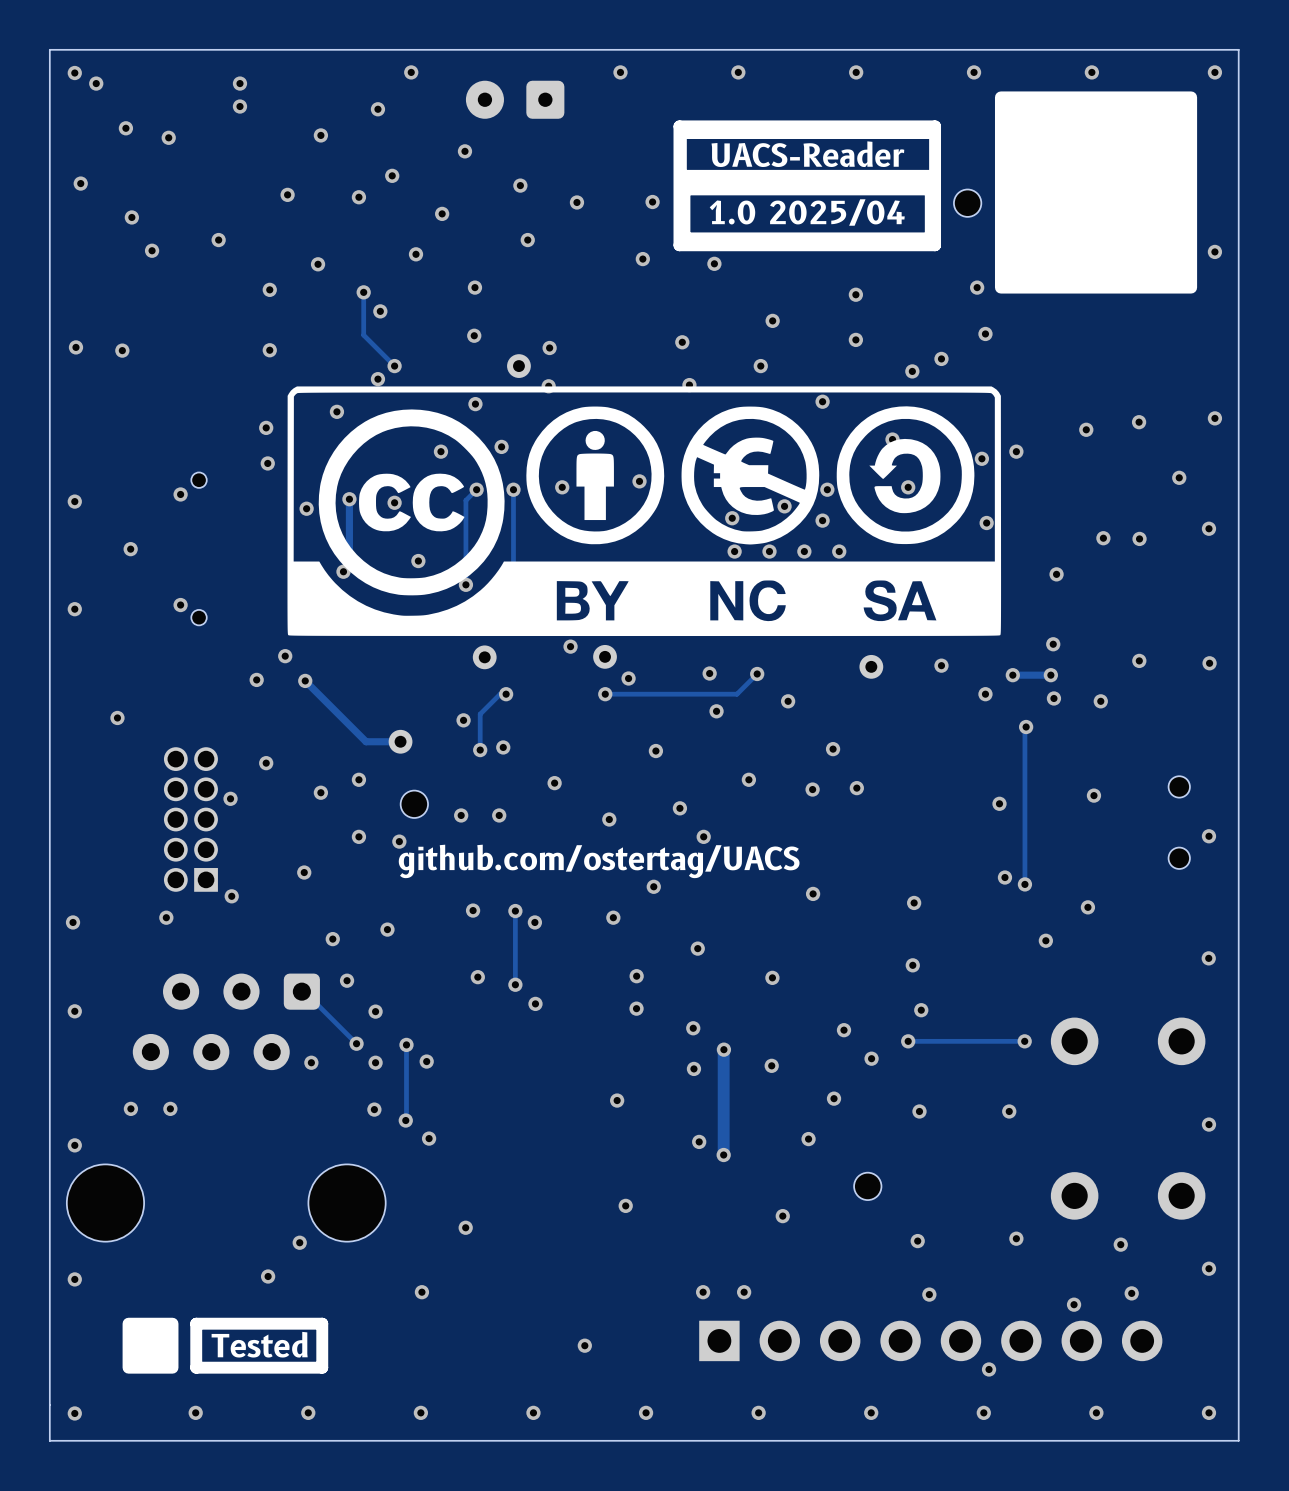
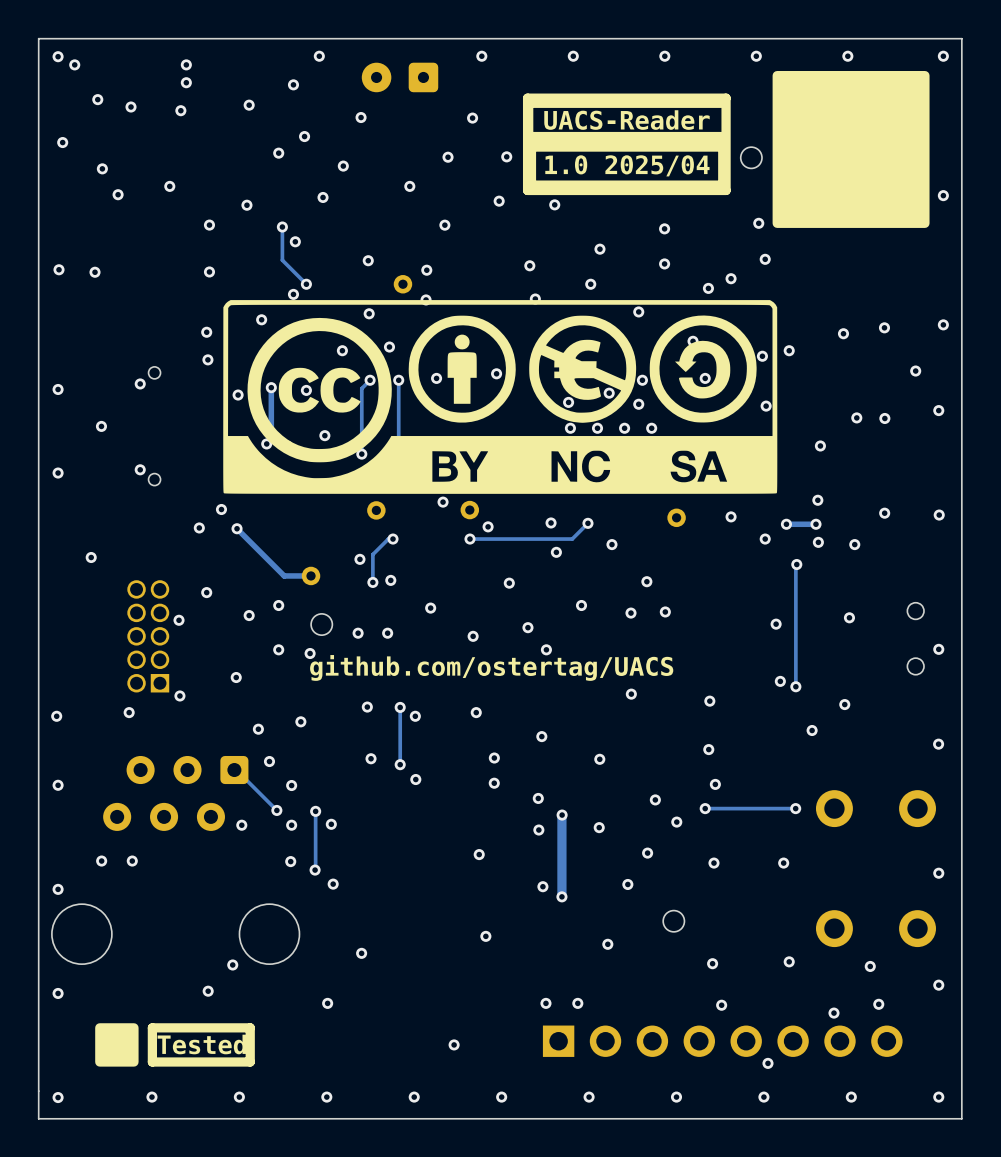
via: none -> (472, 118)
via: (520, 185) -> none
via position: (287, 194) -> (180, 110)
via: (474, 287) -> none
via: none -> (444, 225)
via: (653, 886) -> none

